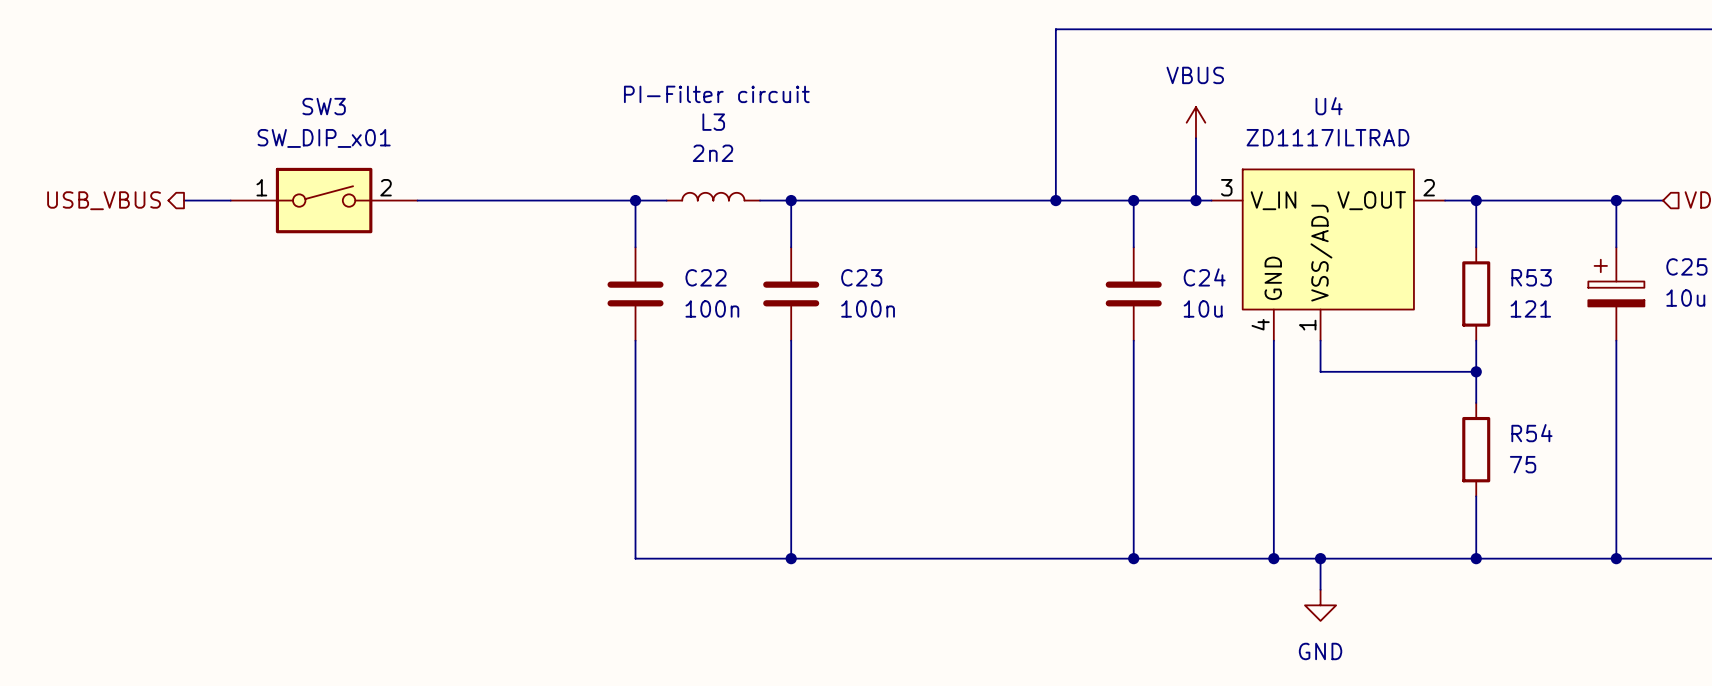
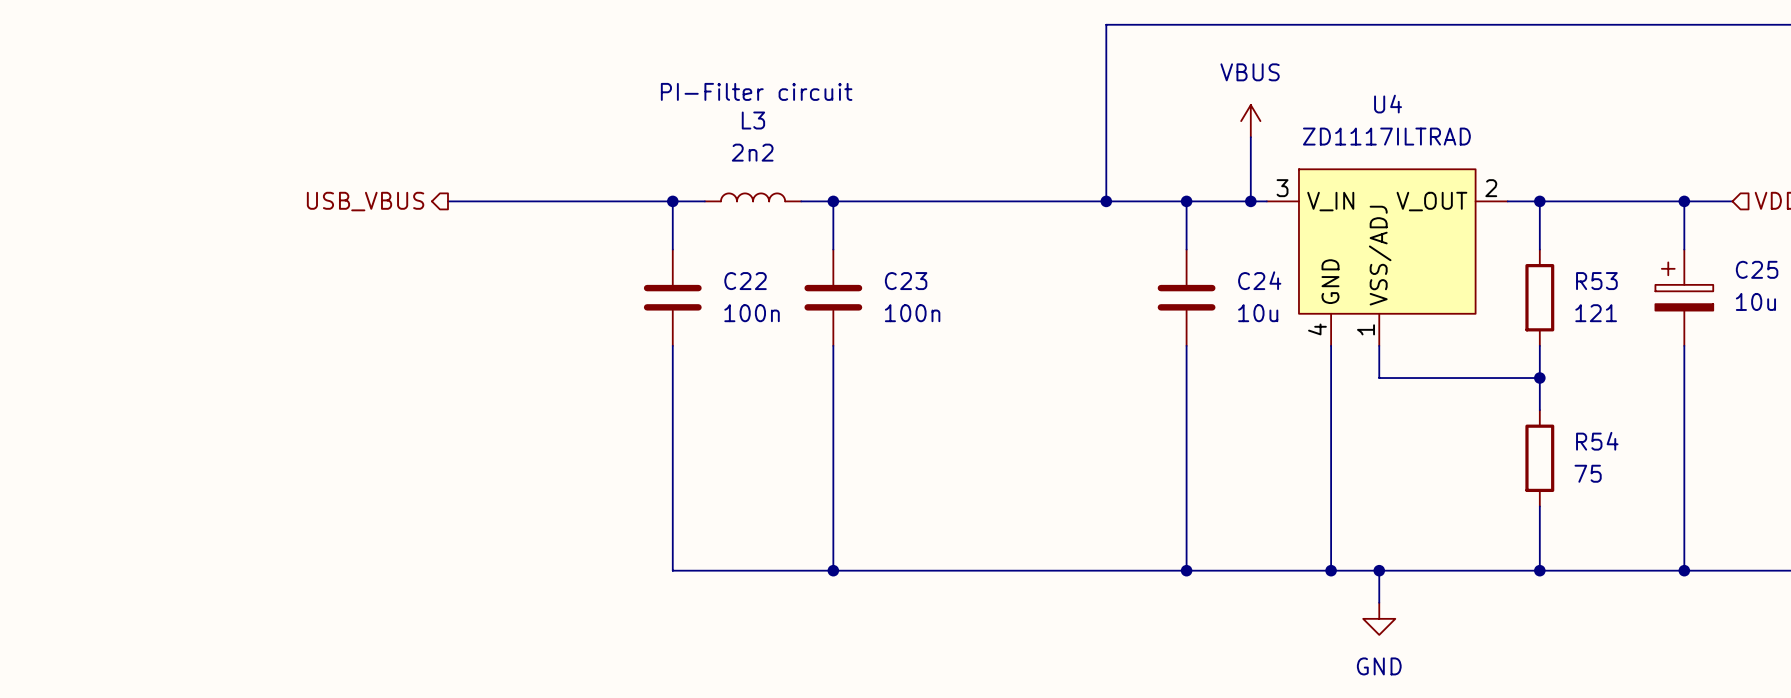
hierarchical label position: USB_VBUS (104, 200) -> USB_VBUS (365, 201)
wire: (184, 200) (230, 200) -> none
SW3: SW_DIP_x01 (324, 200) -> none

